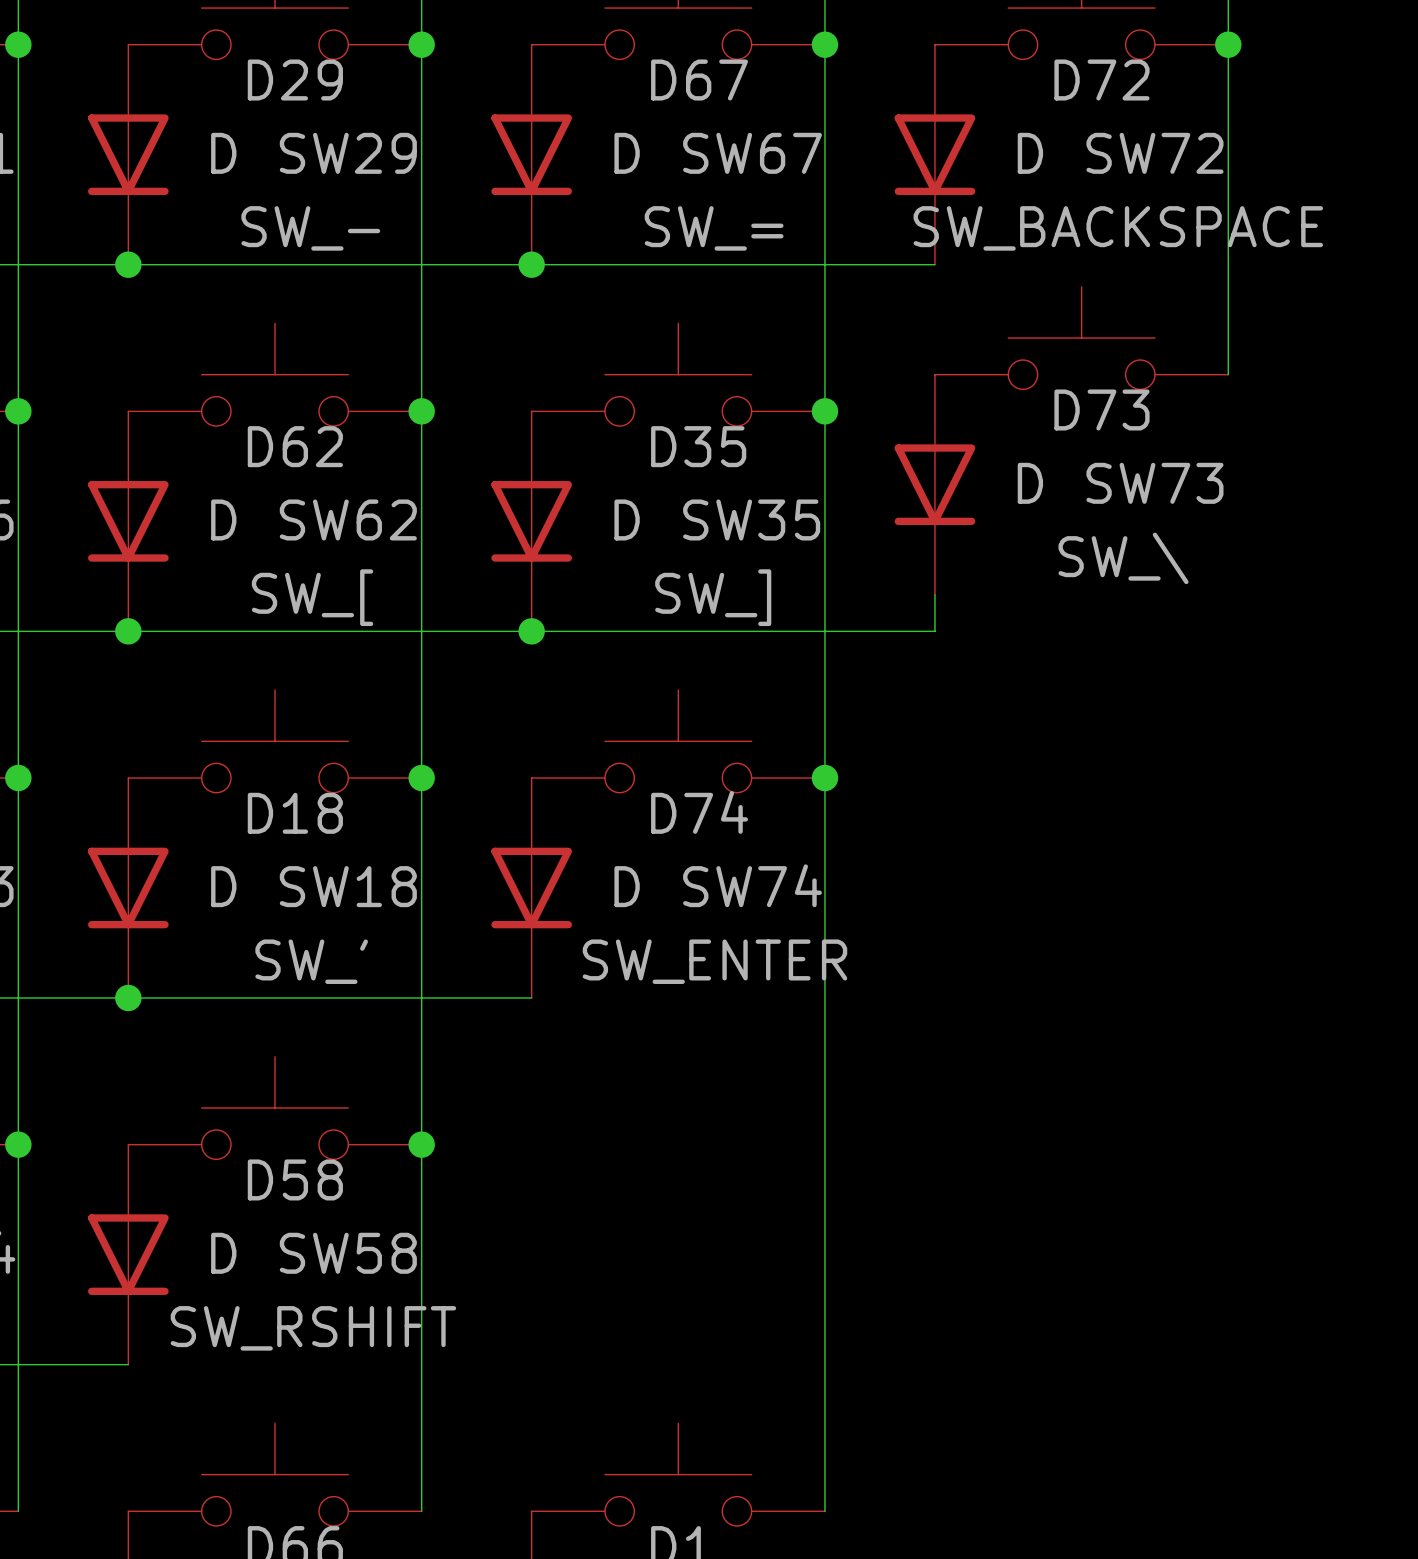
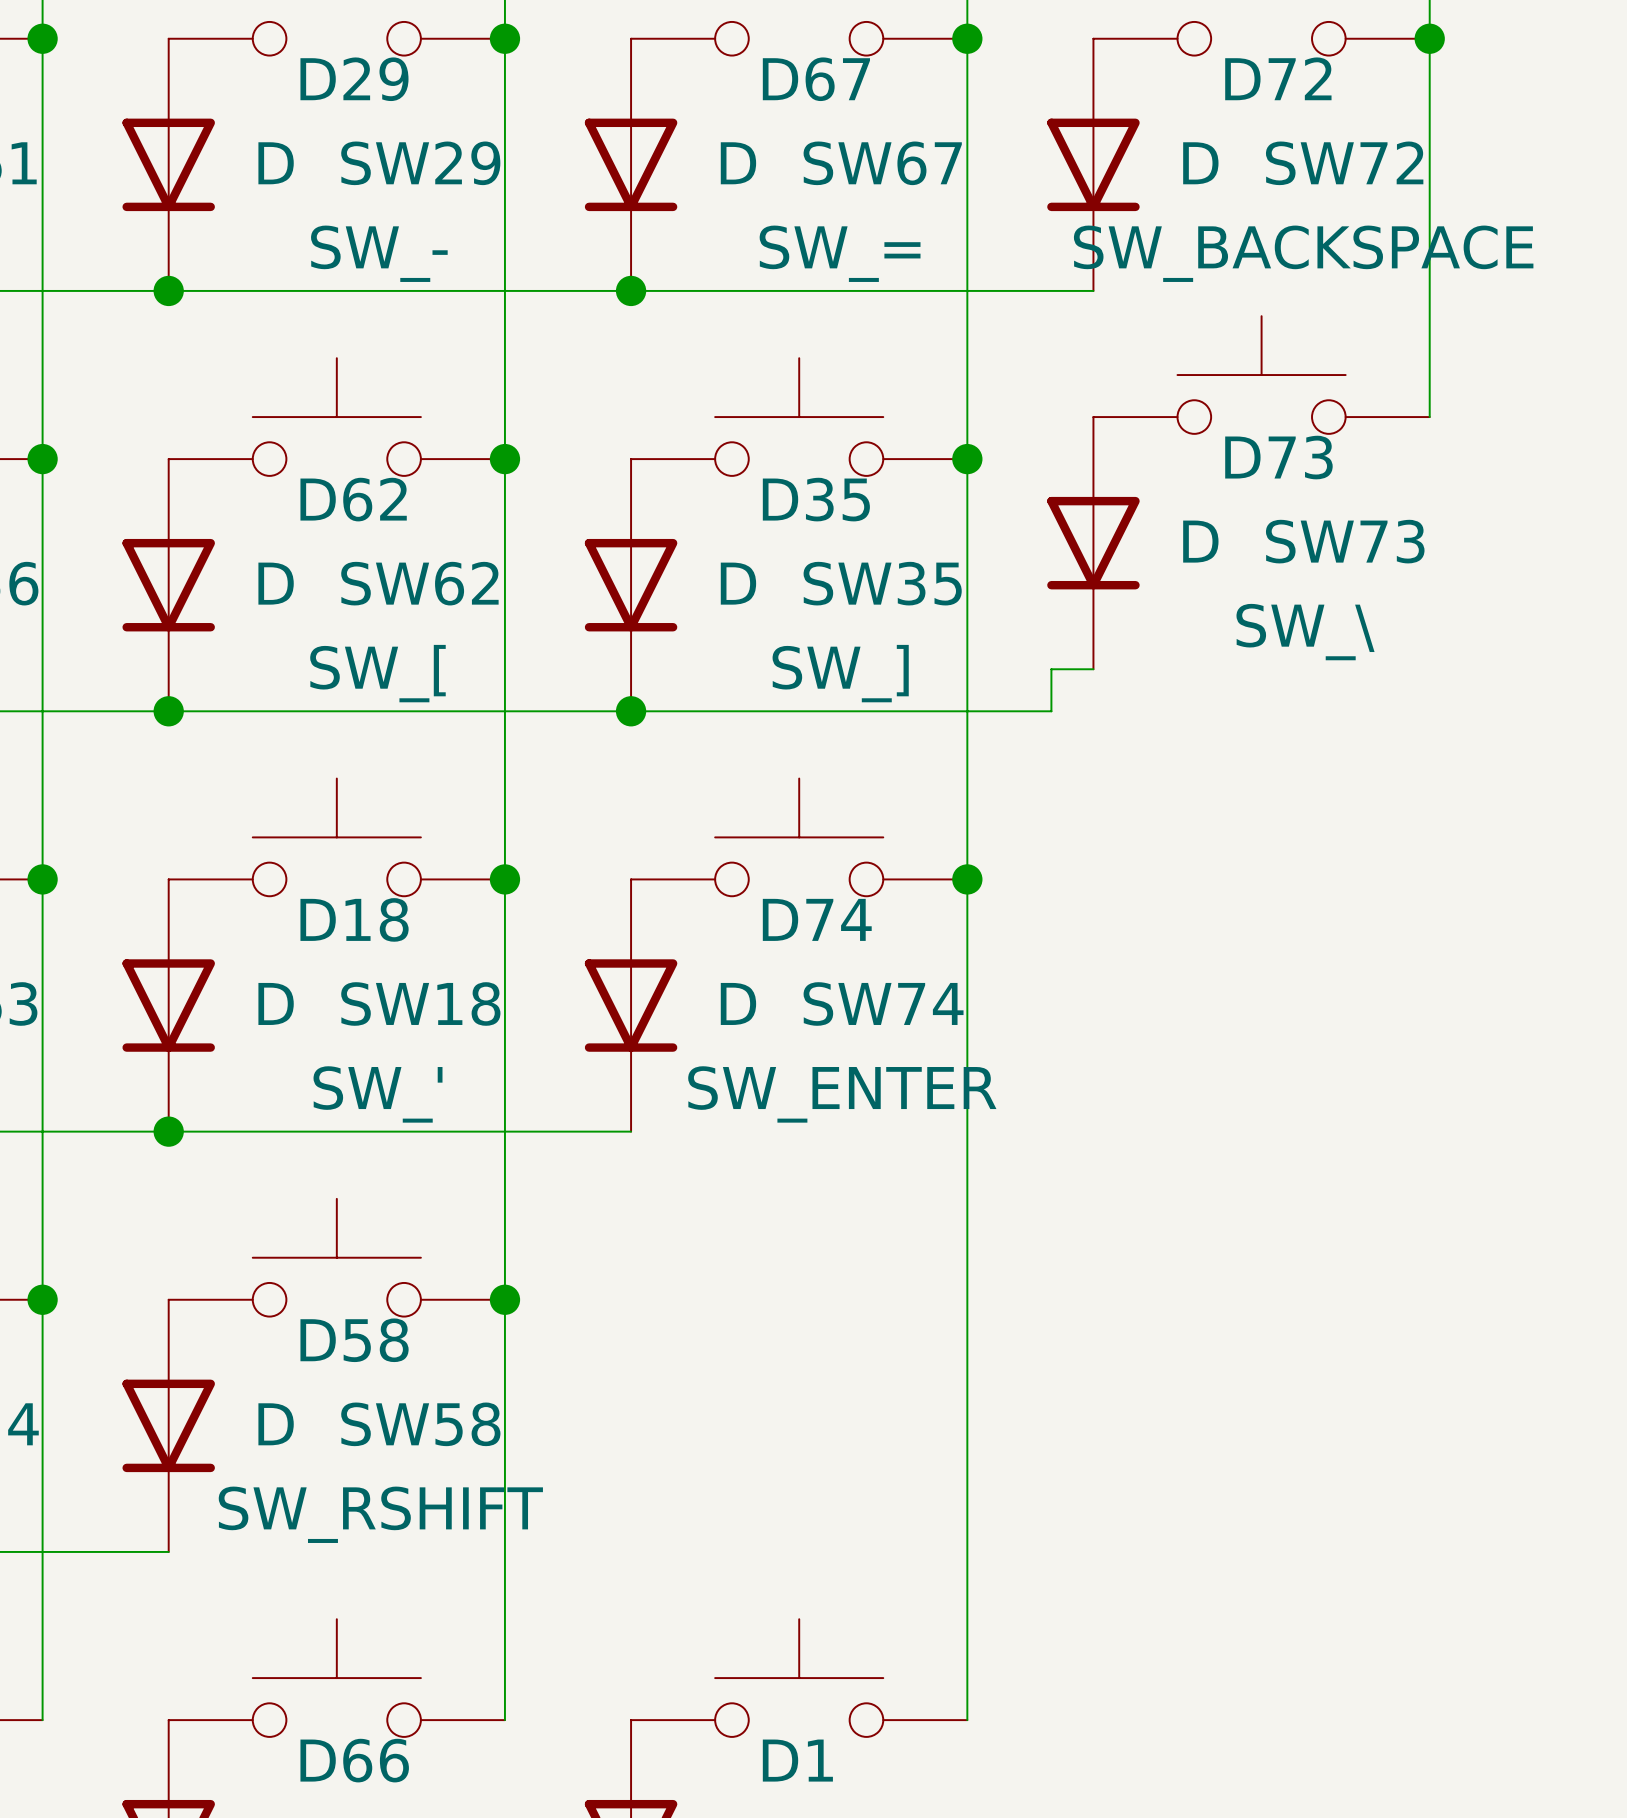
wire: (934, 594) (934, 631) (898, 631) -> (1093, 669) (1051, 669) (1051, 711)

